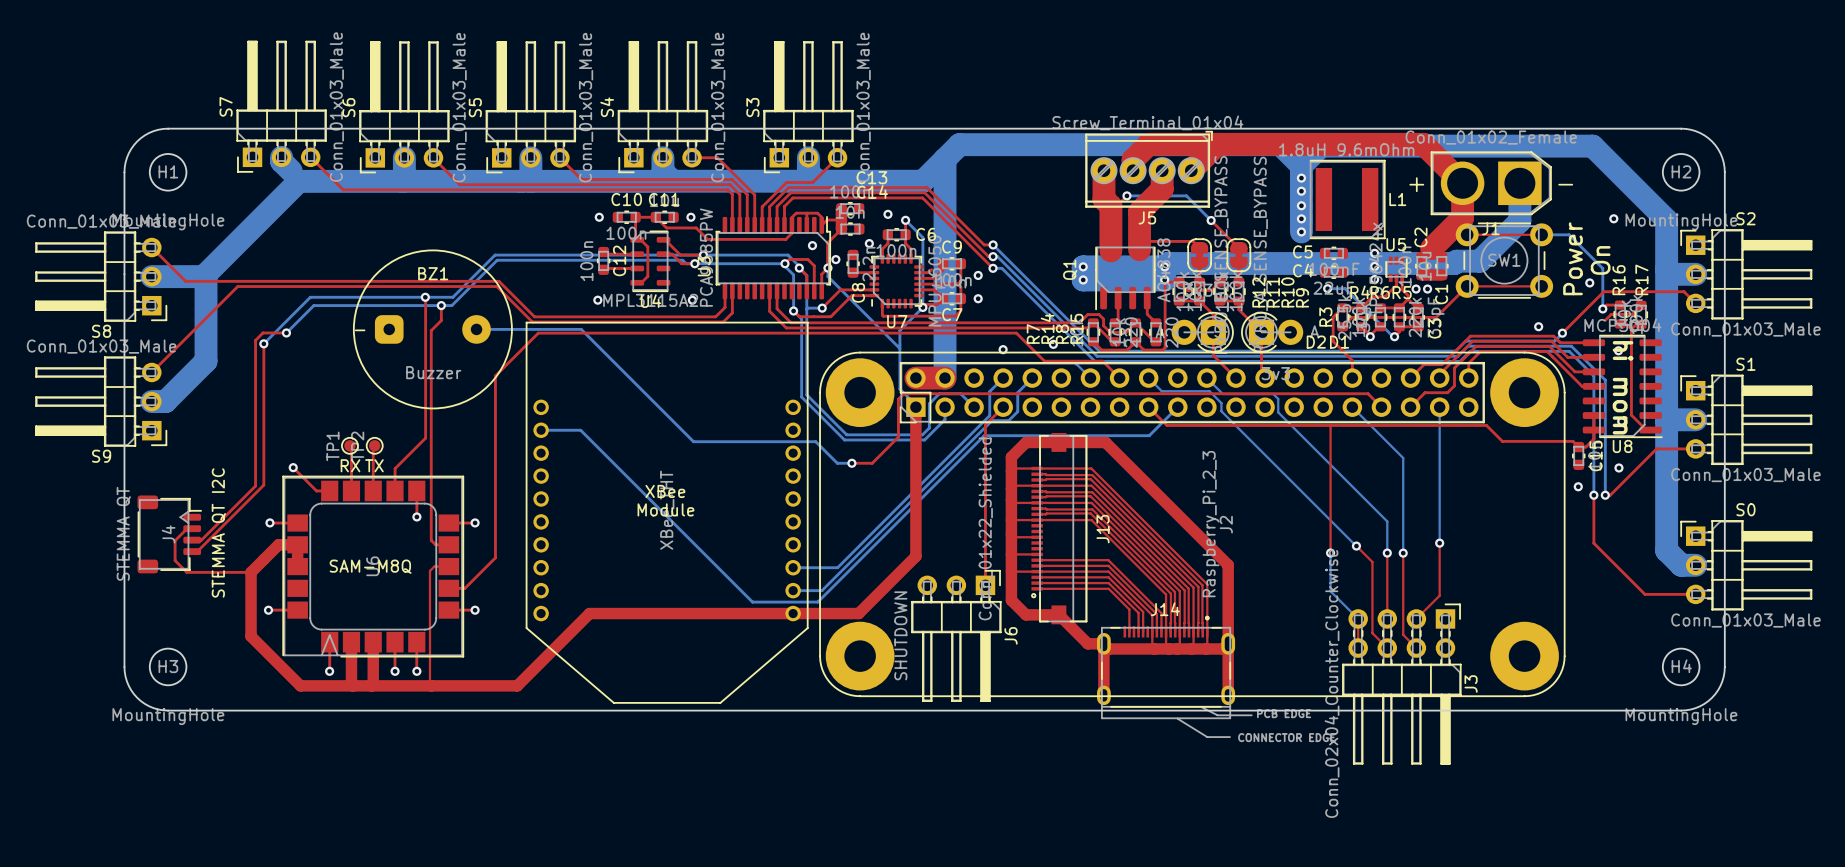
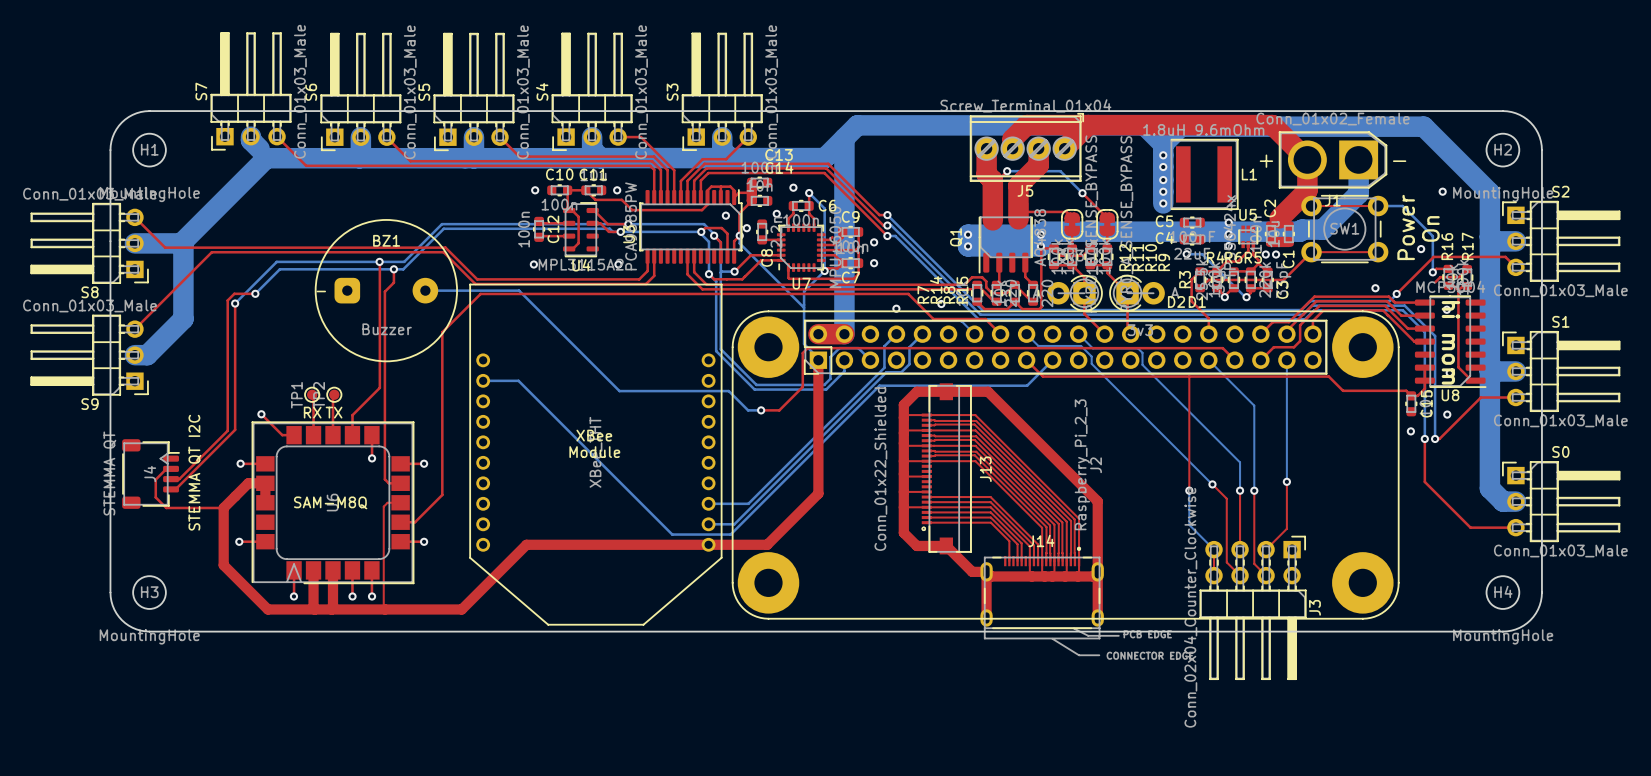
top track: (1003, 407) (985, 424) (985, 585) -> none
J6: SHUTDOWN (956, 635) -> none

